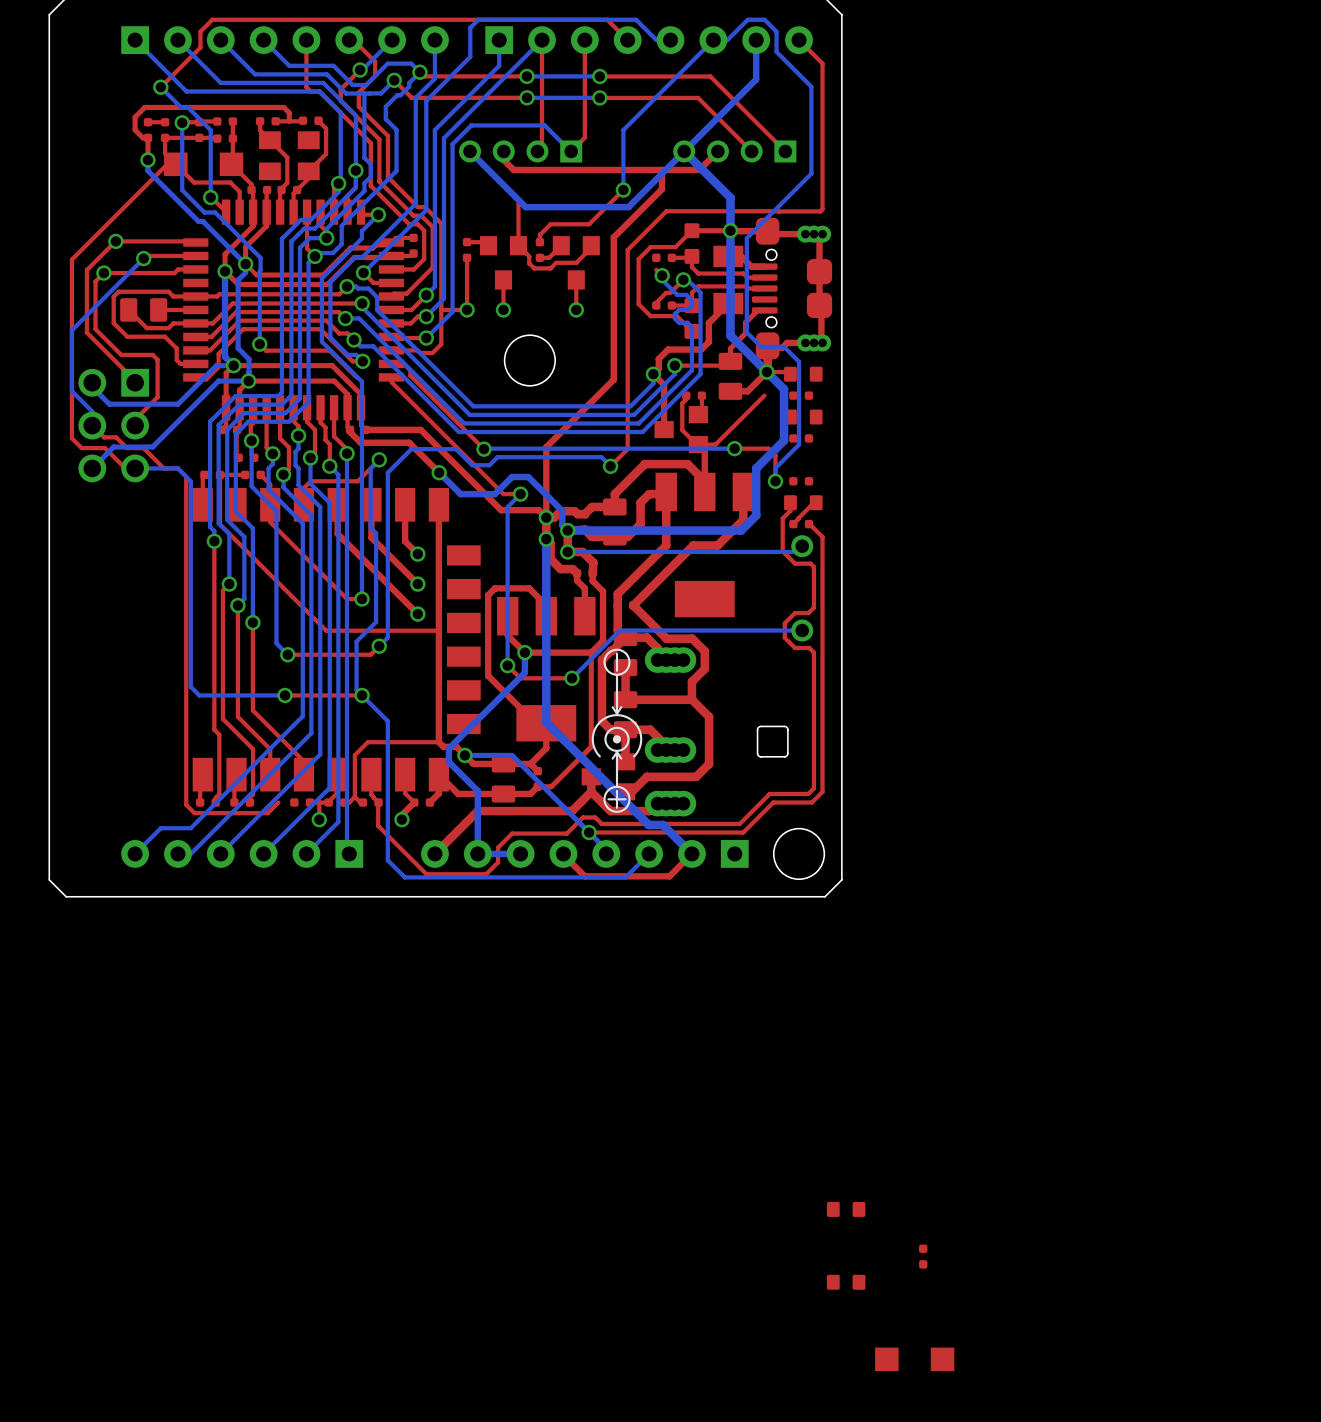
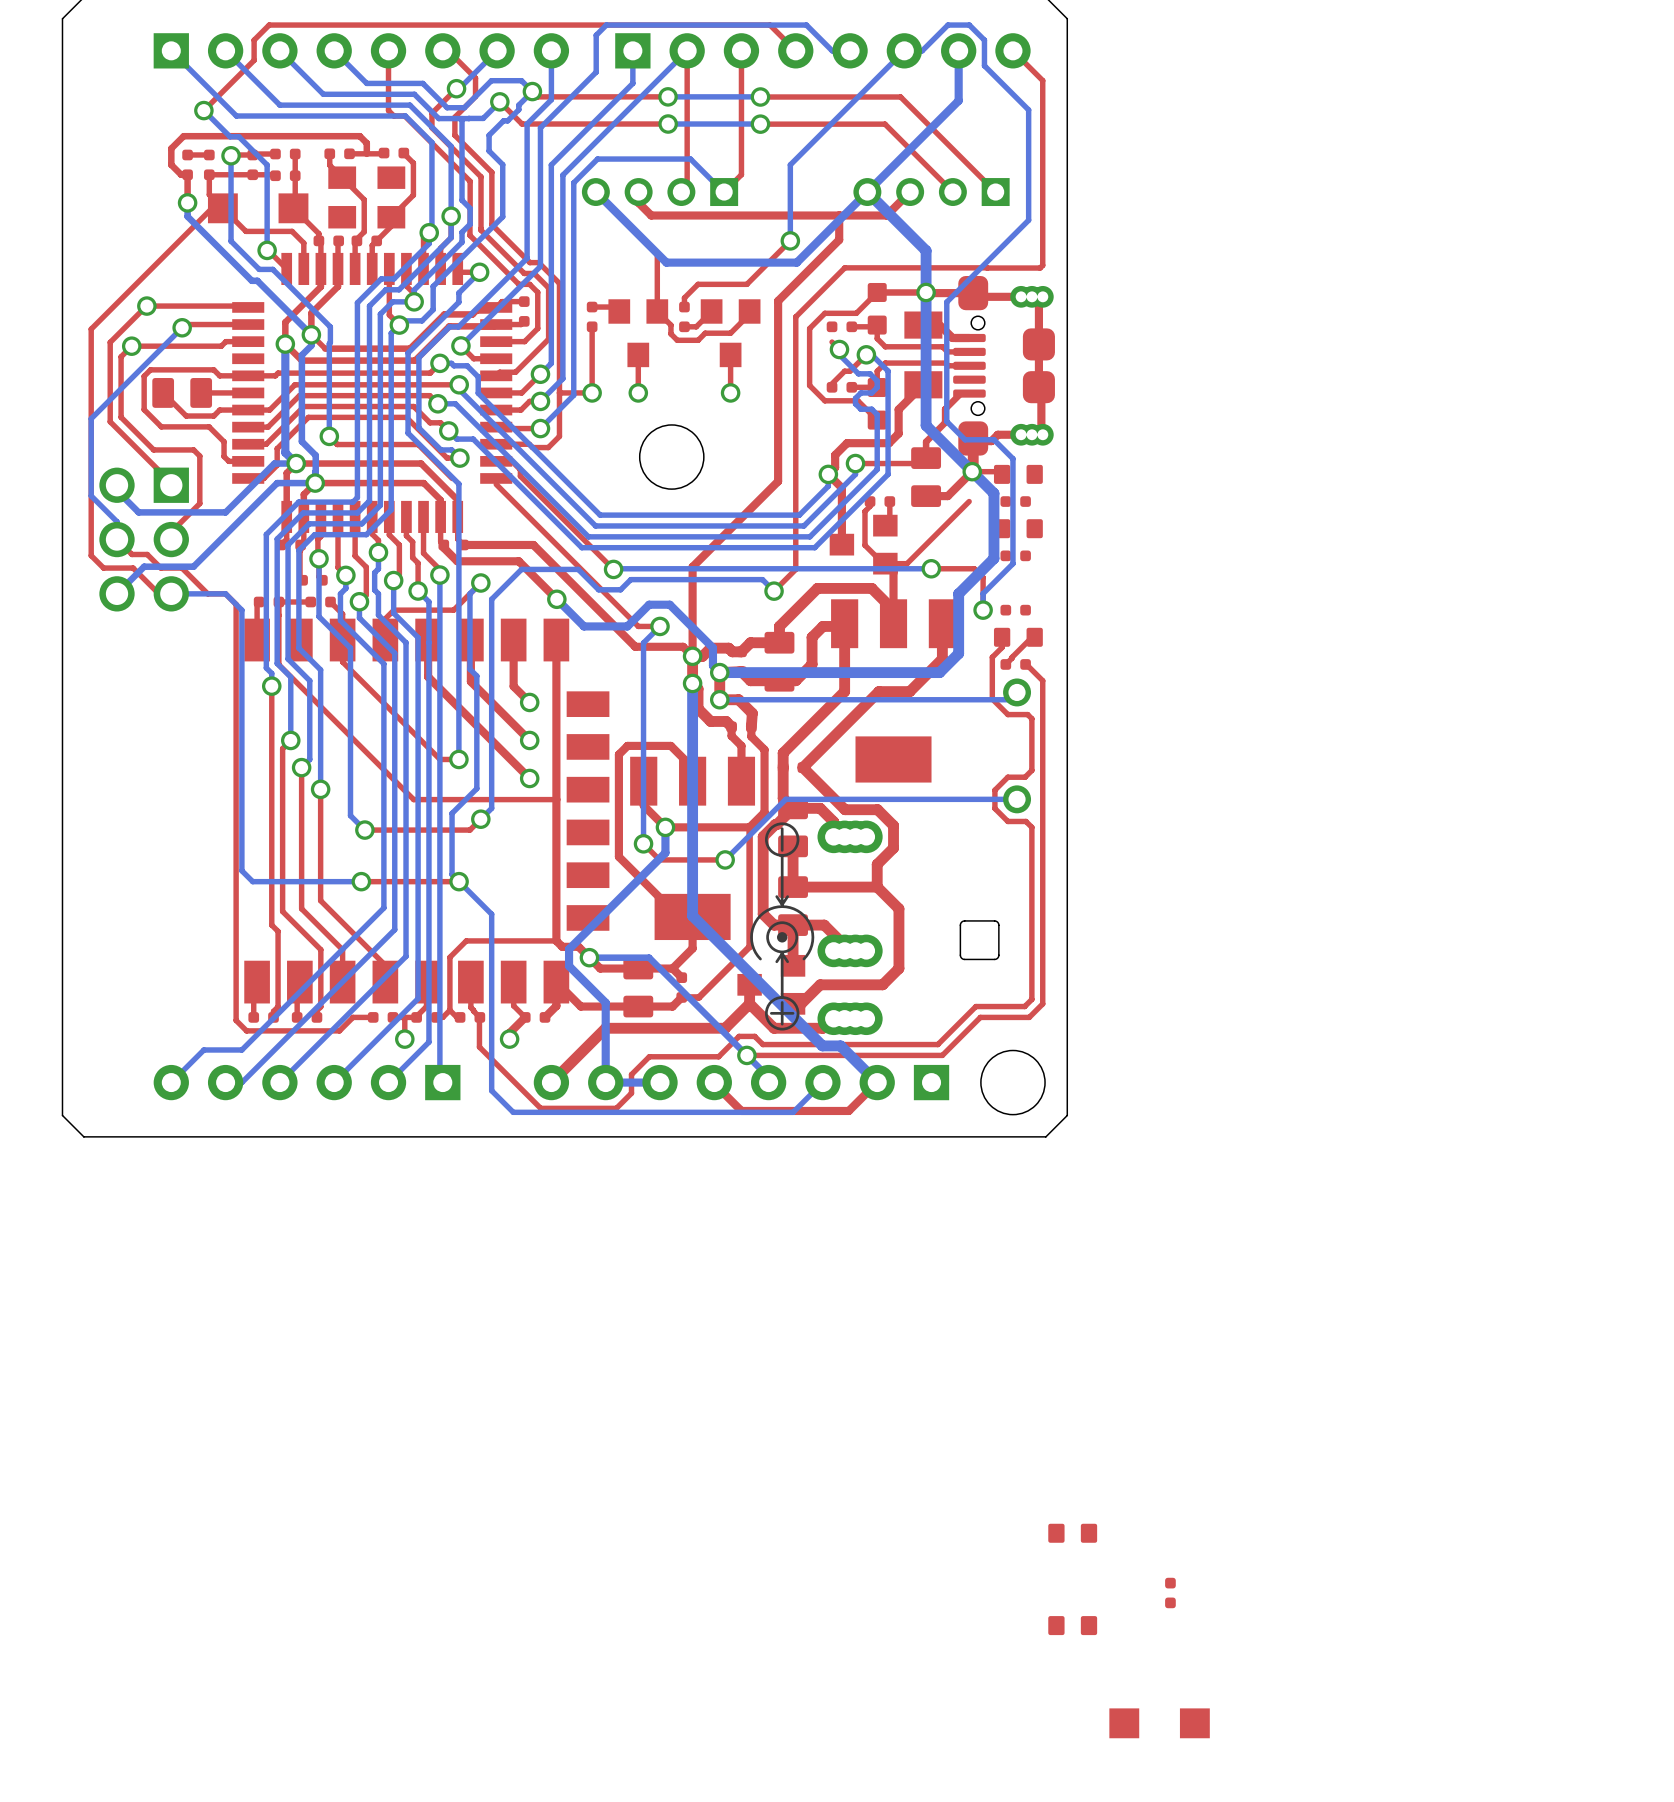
top track: none -> (373, 1017) (353, 1017)

